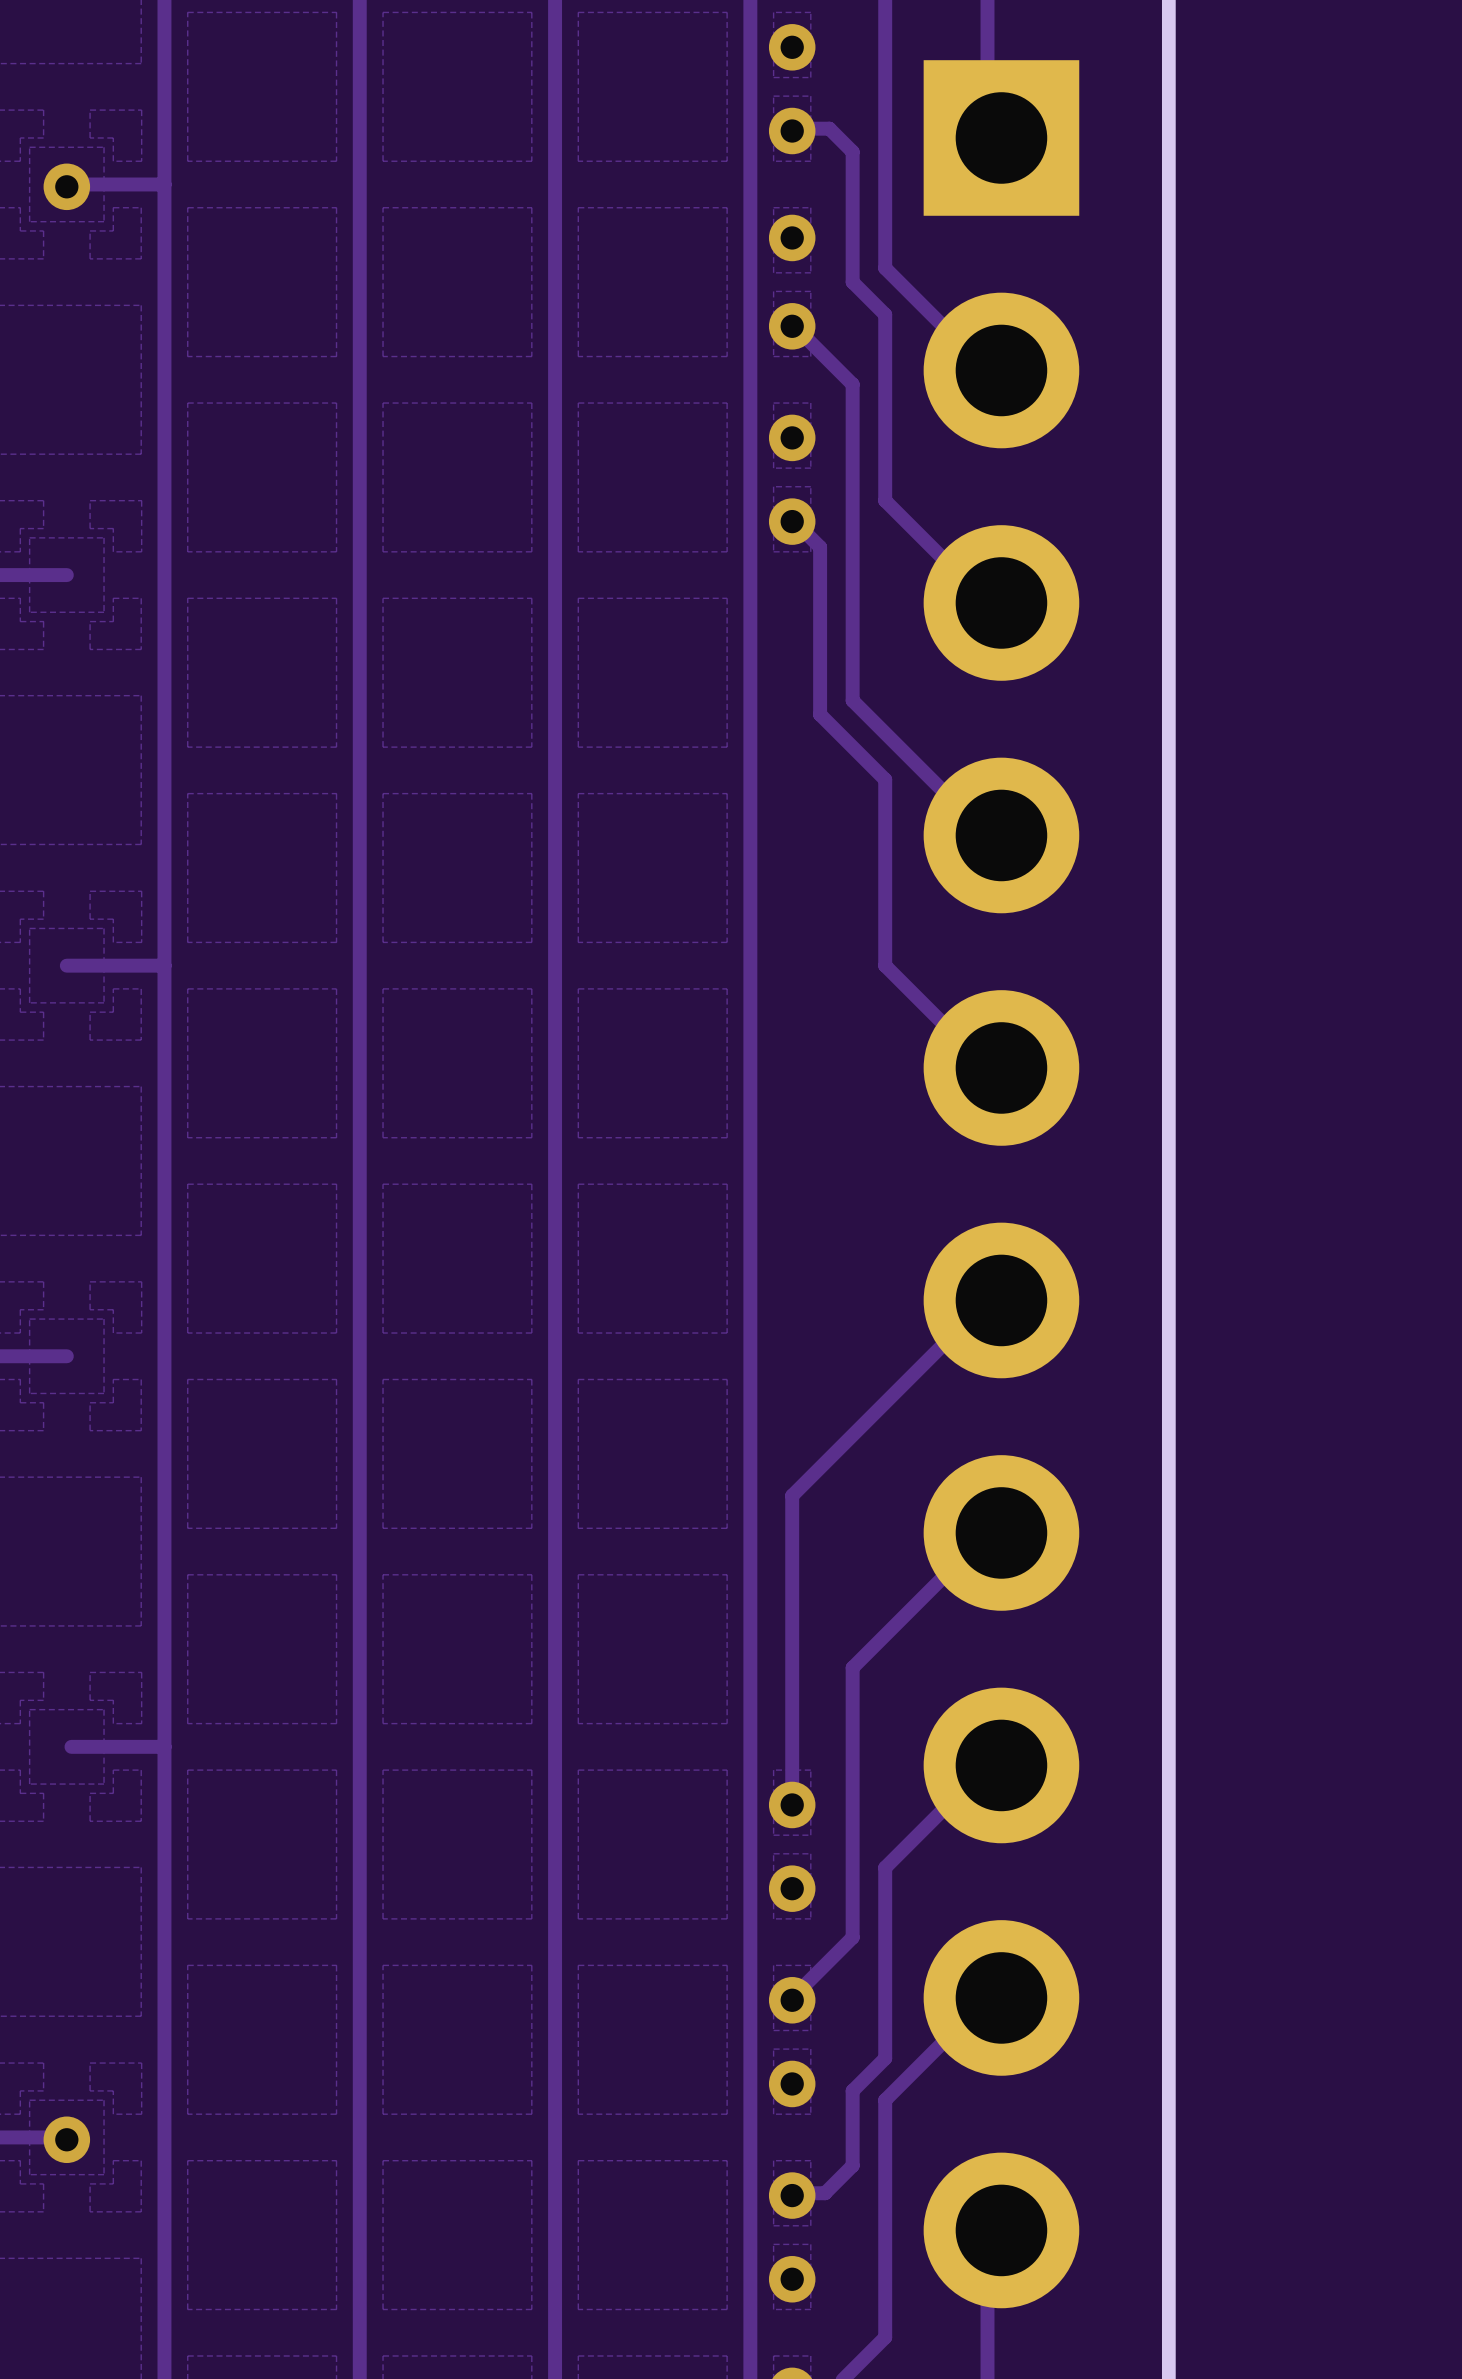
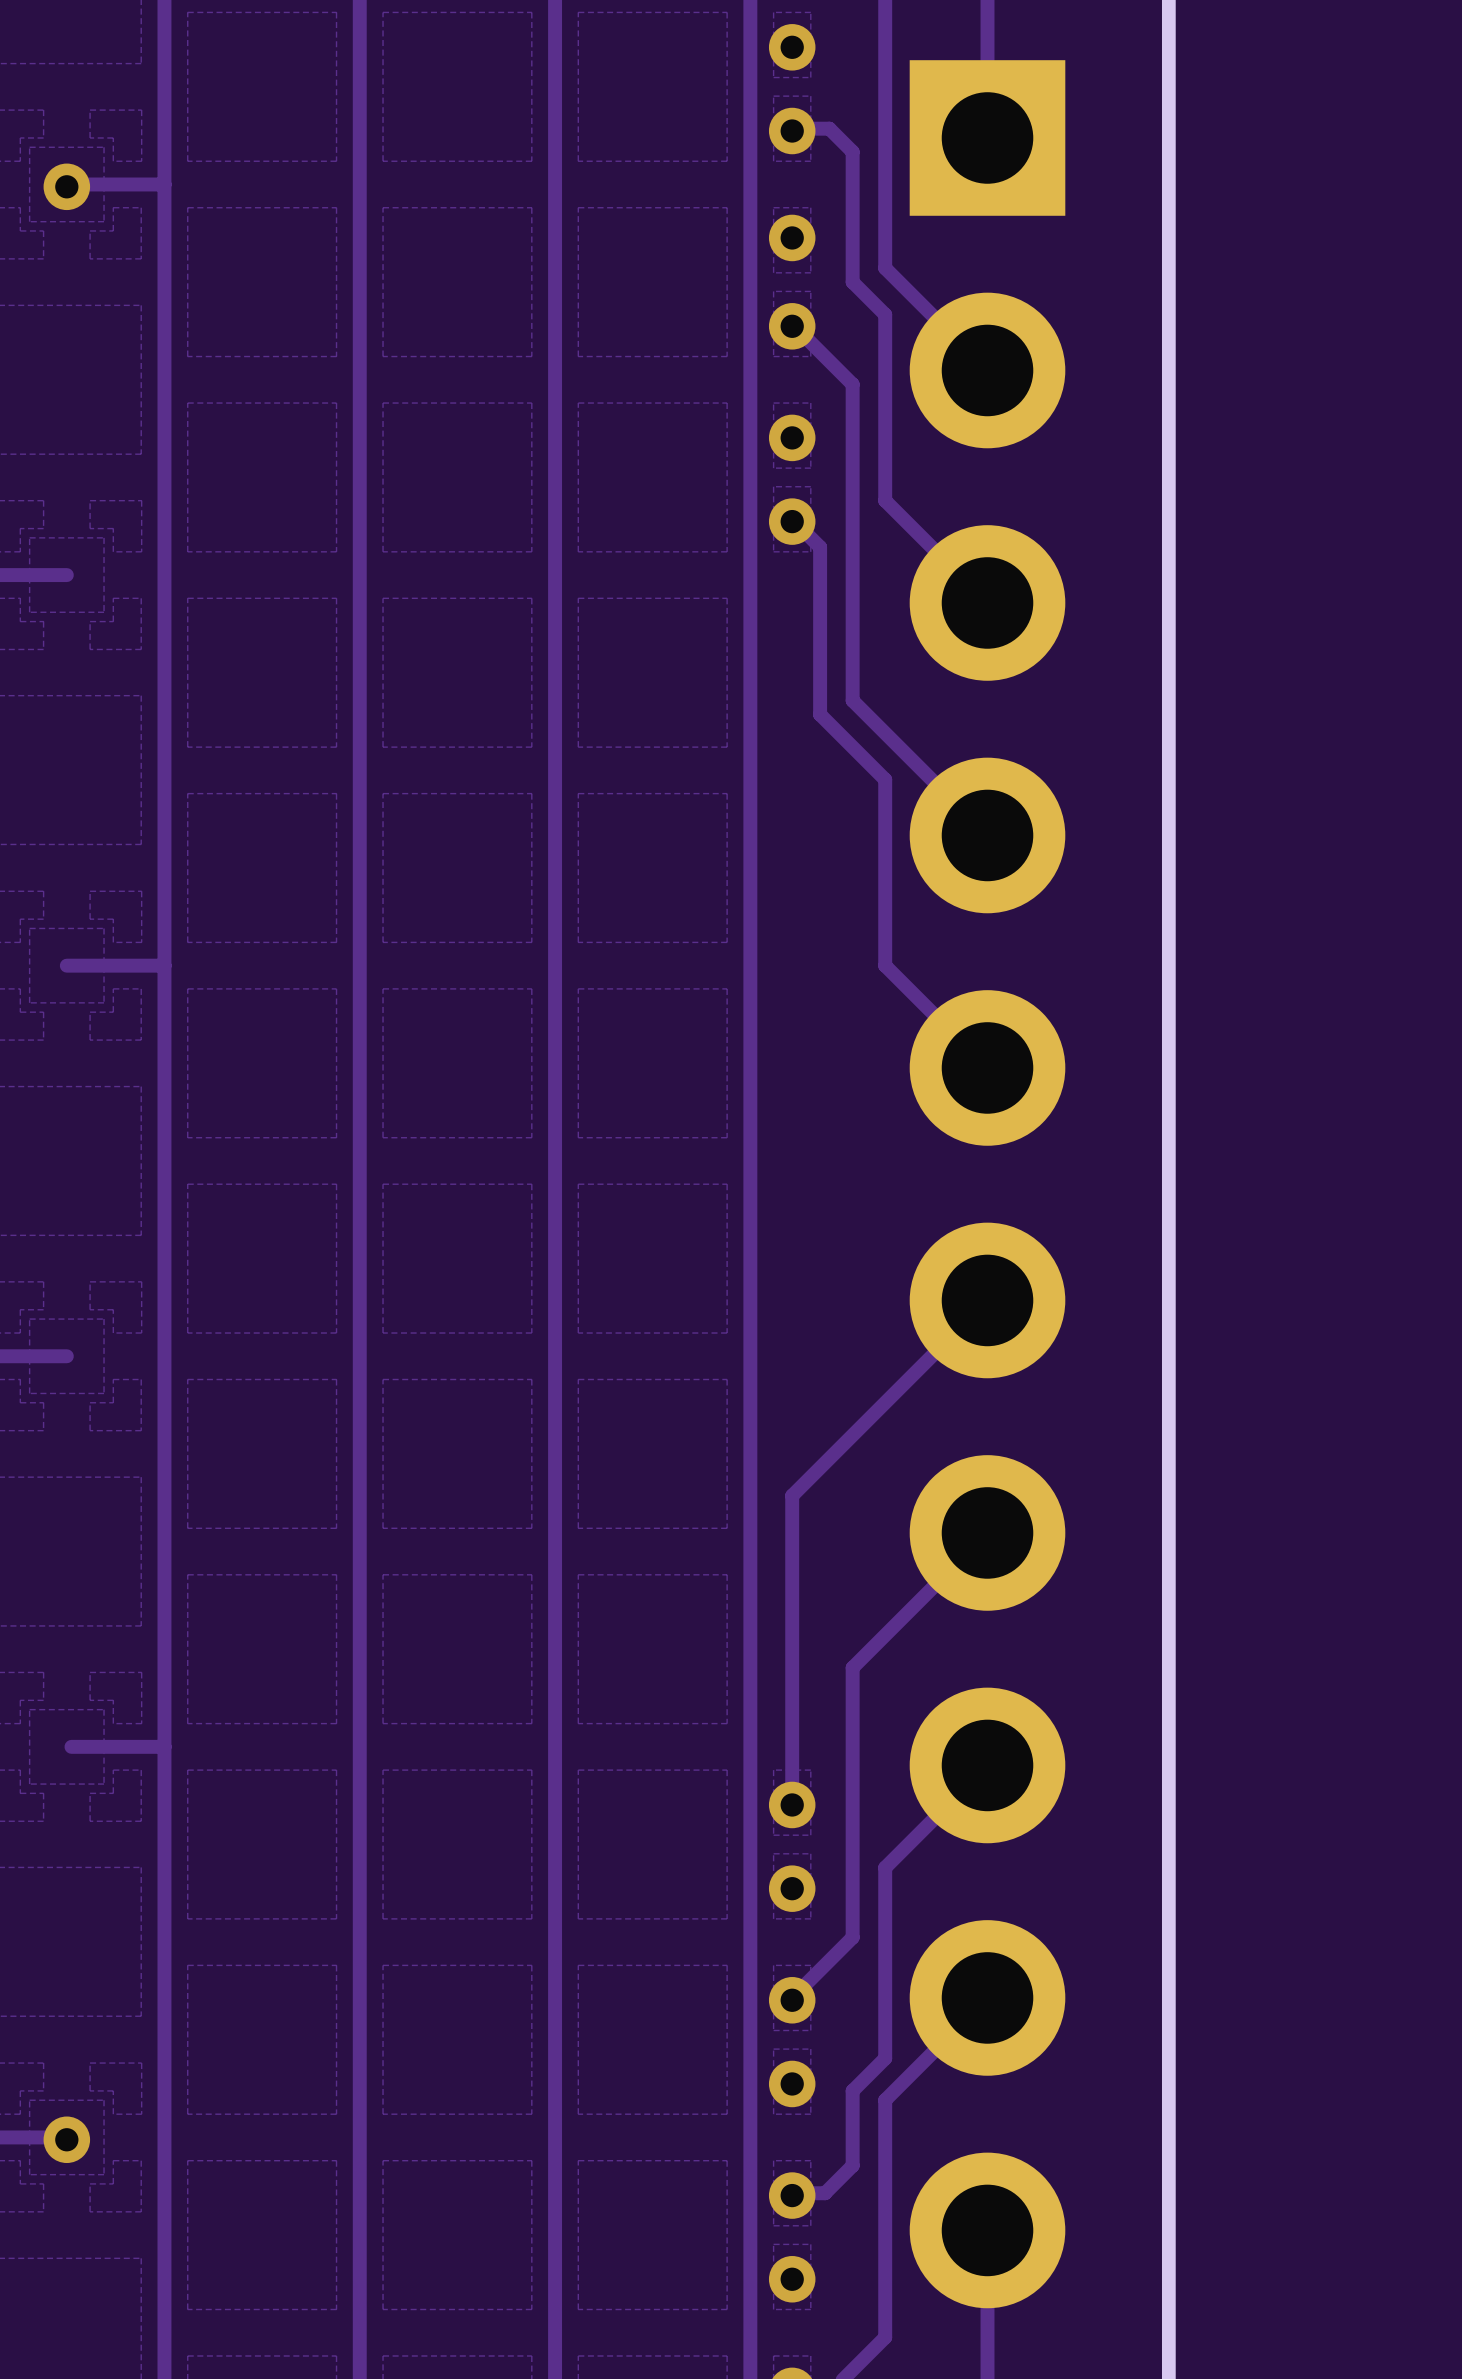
part position: (1001, 1184) -> (987, 1184)

